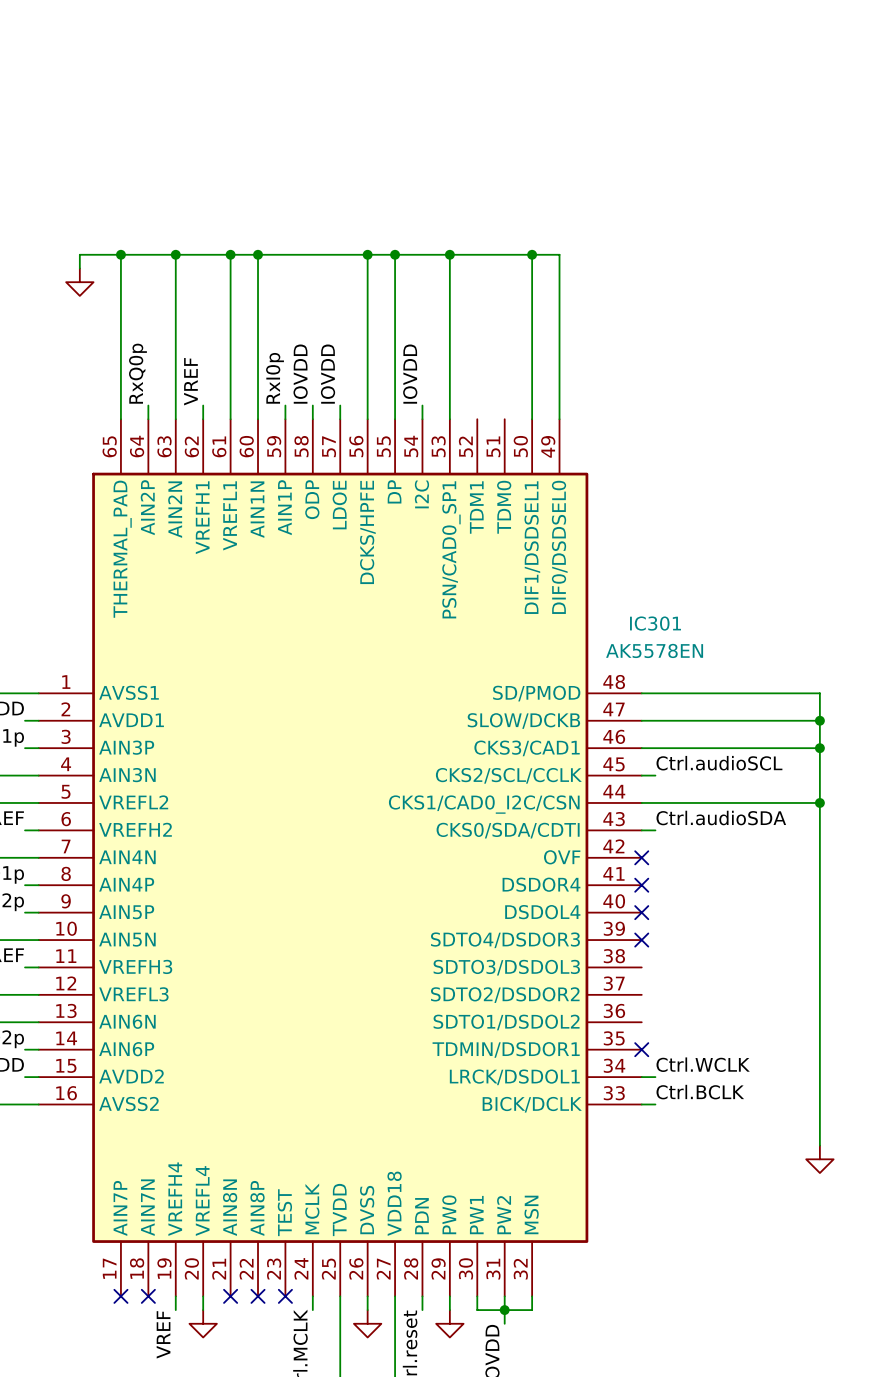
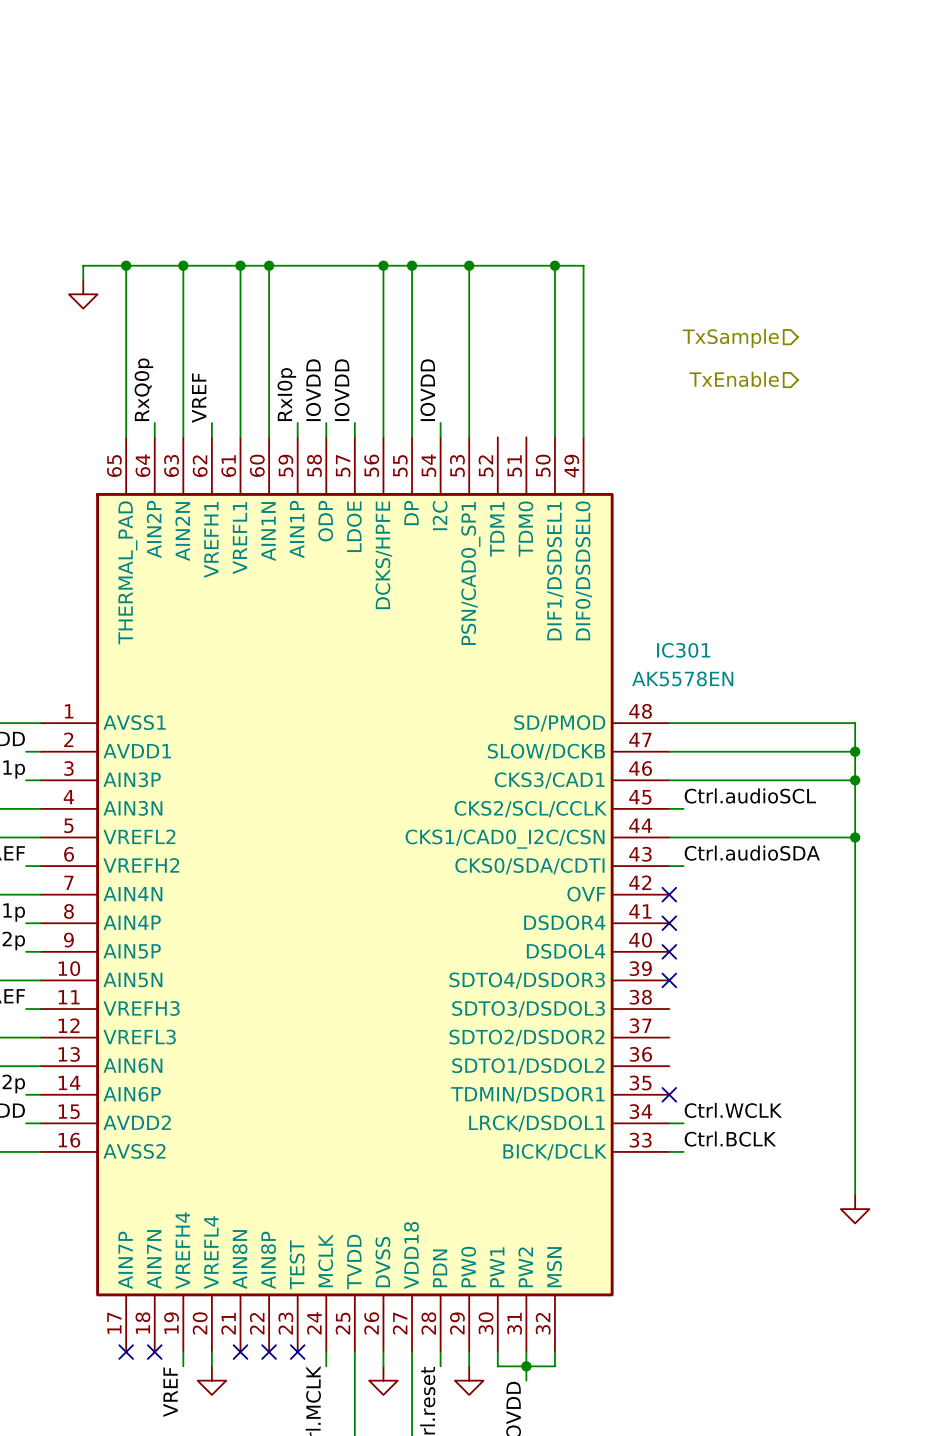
hierarchical label: none -> TxSample (730, 338)
hierarchical label: none -> TxEnable (734, 379)

